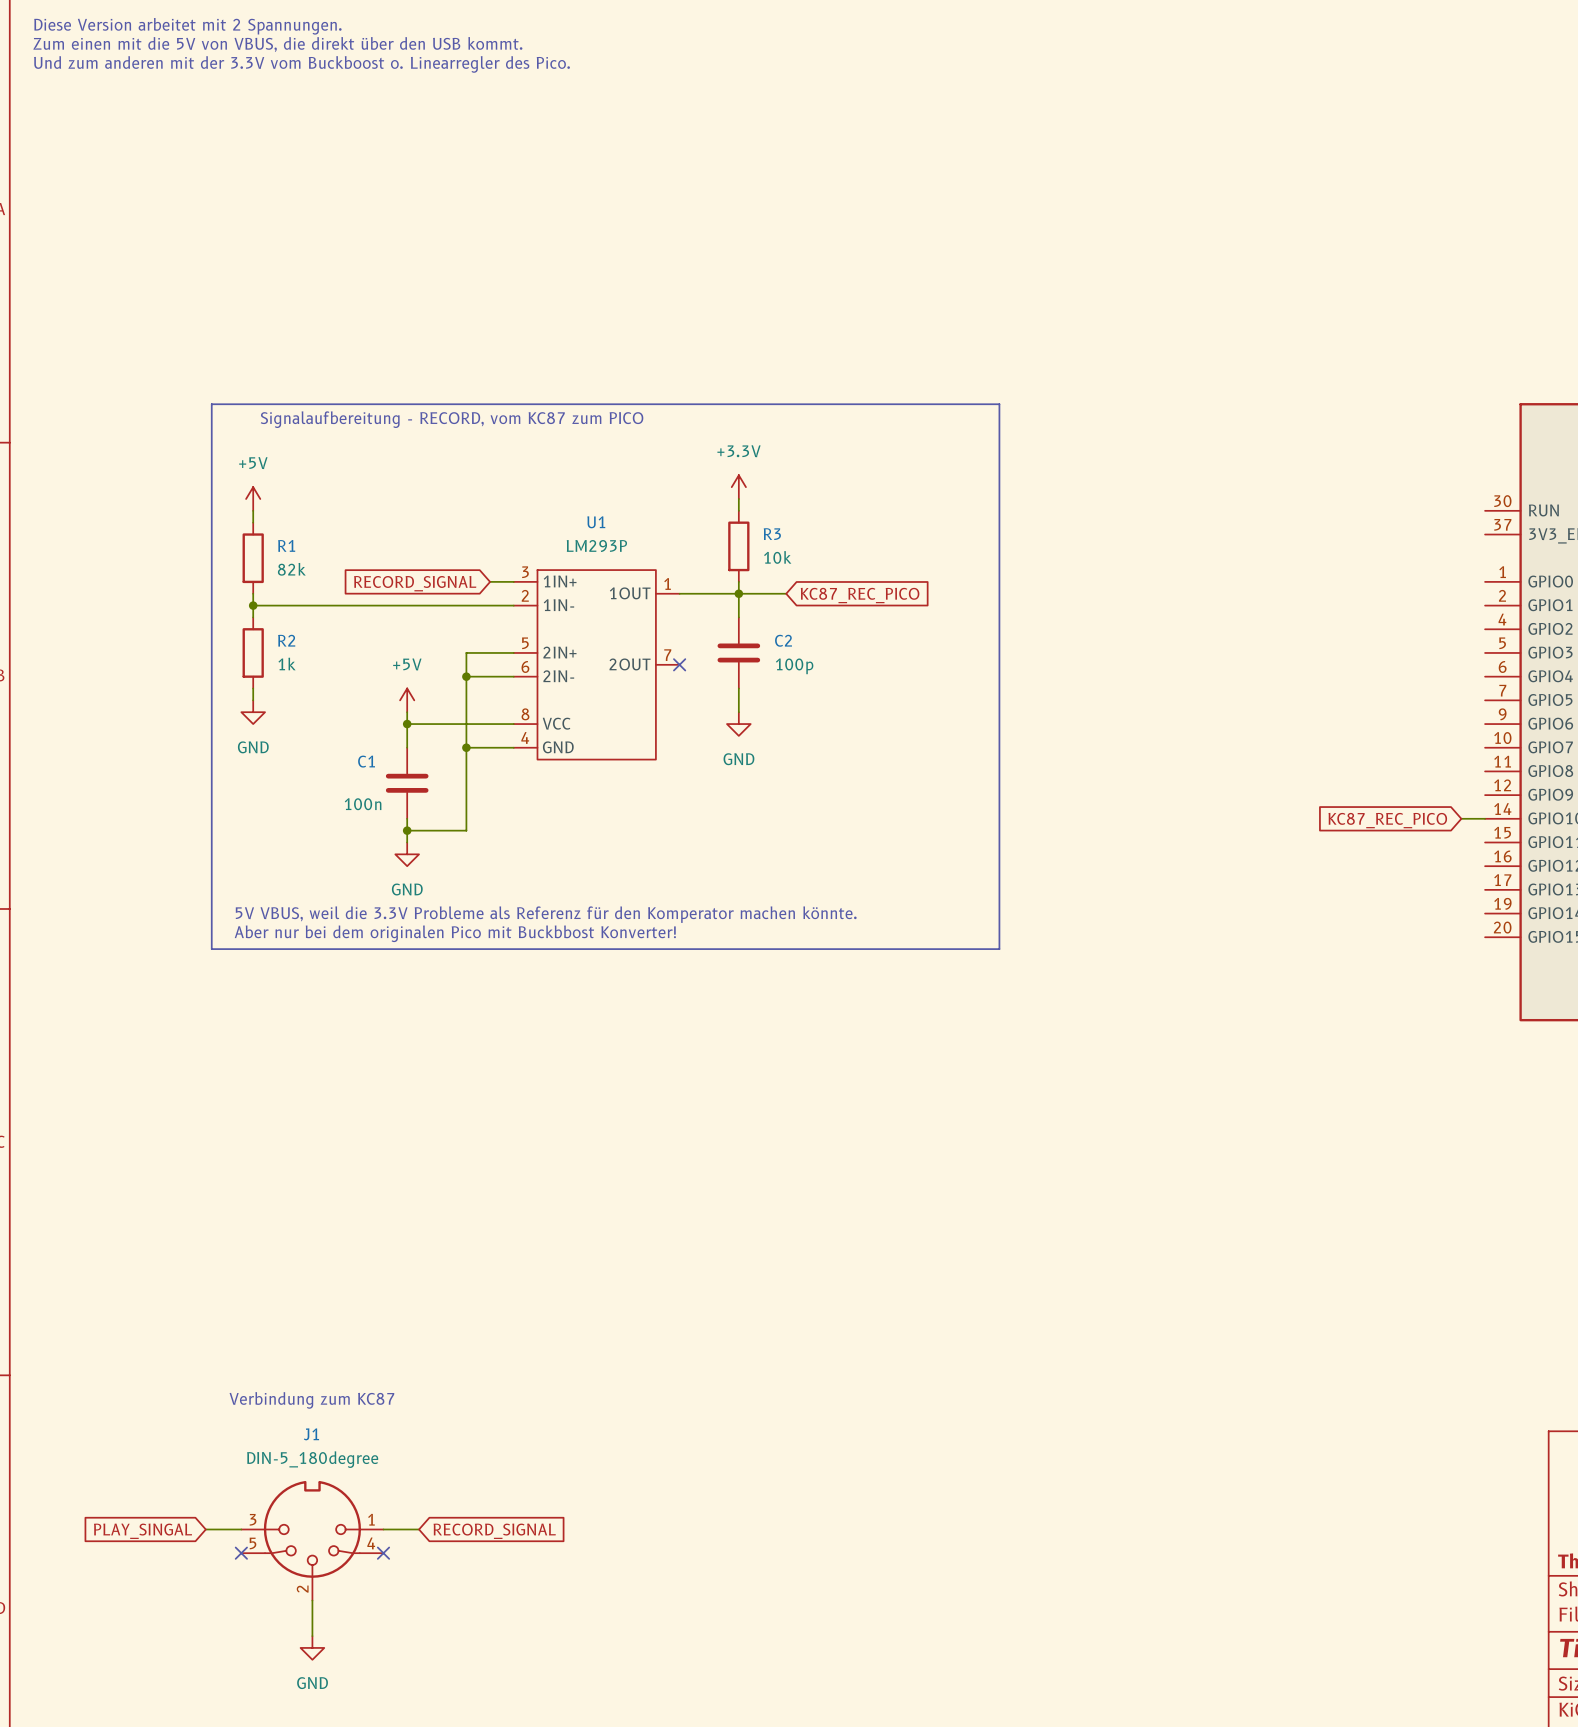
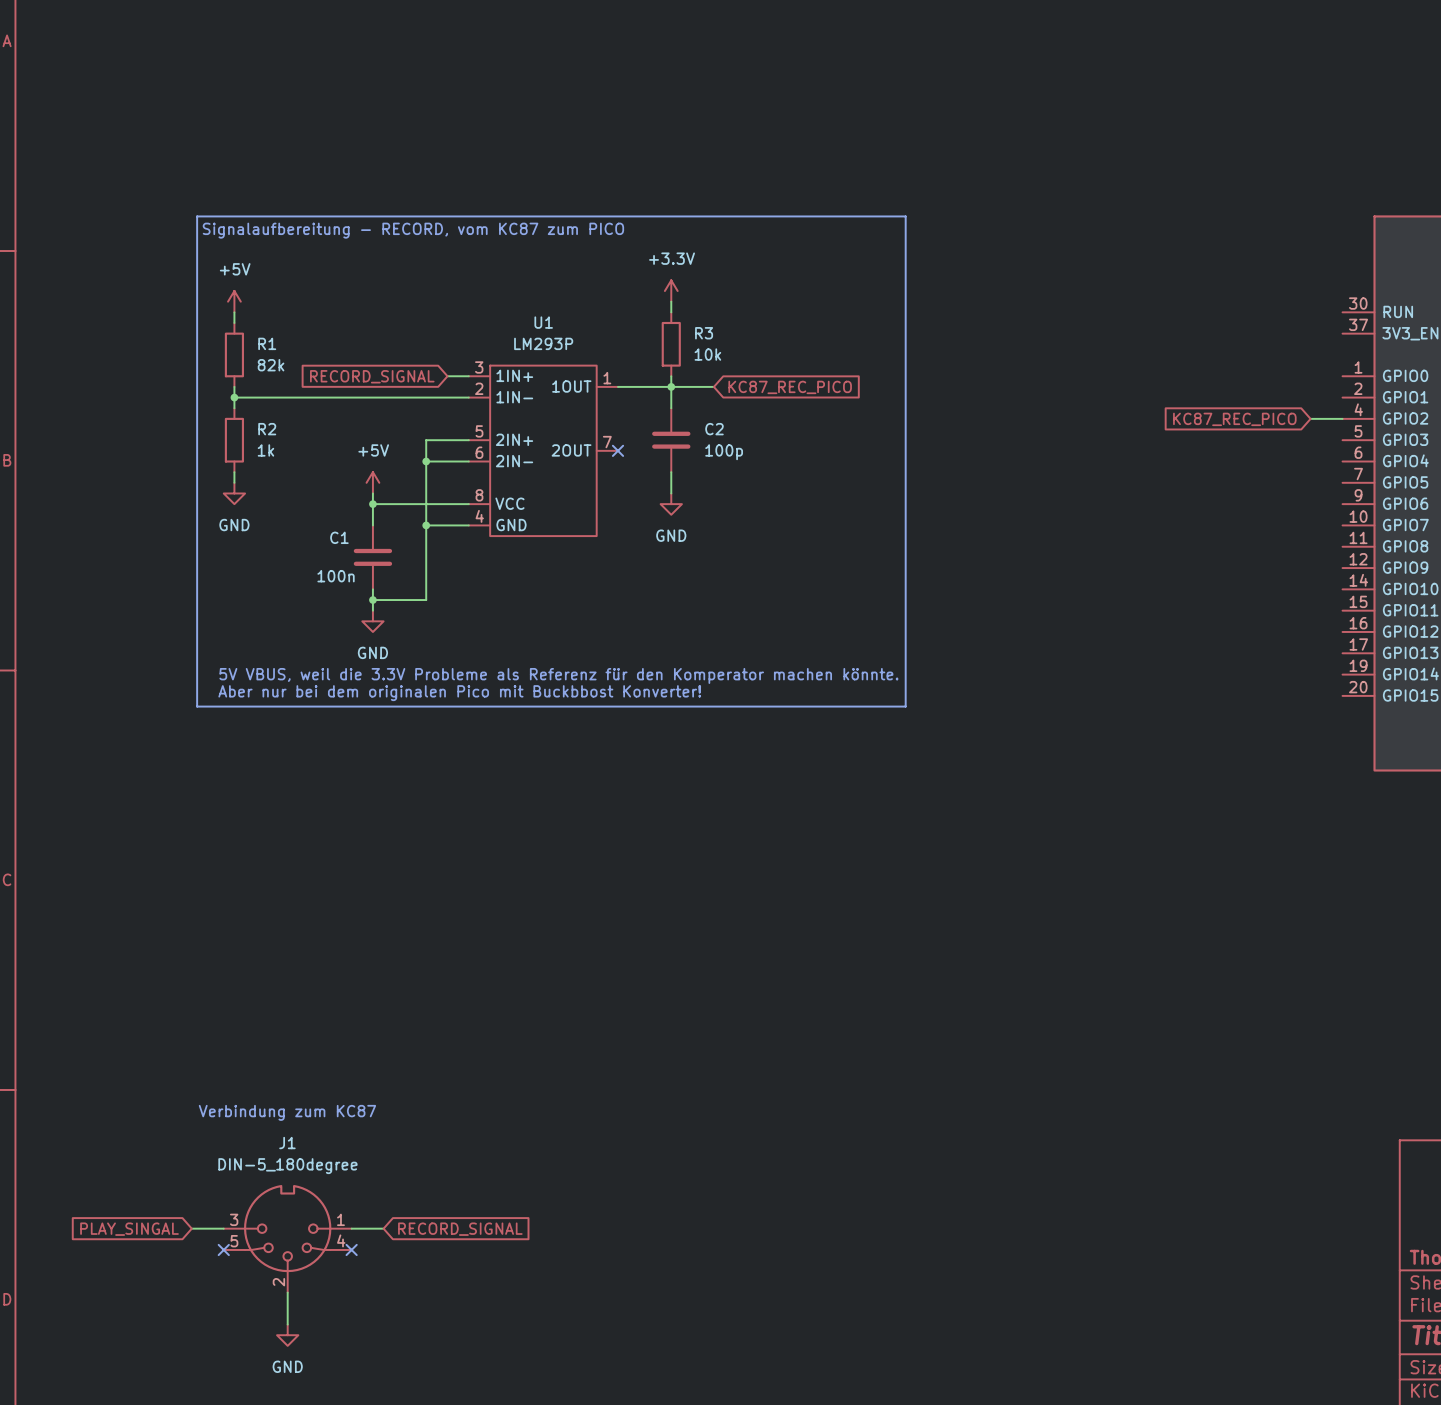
wire: none -> (1310, 418) (1342, 418)
wire: (1461, 818) (1485, 818) -> none
global label position: KC87_REC_PICO (1387, 820) -> KC87_REC_PICO (1234, 419)

